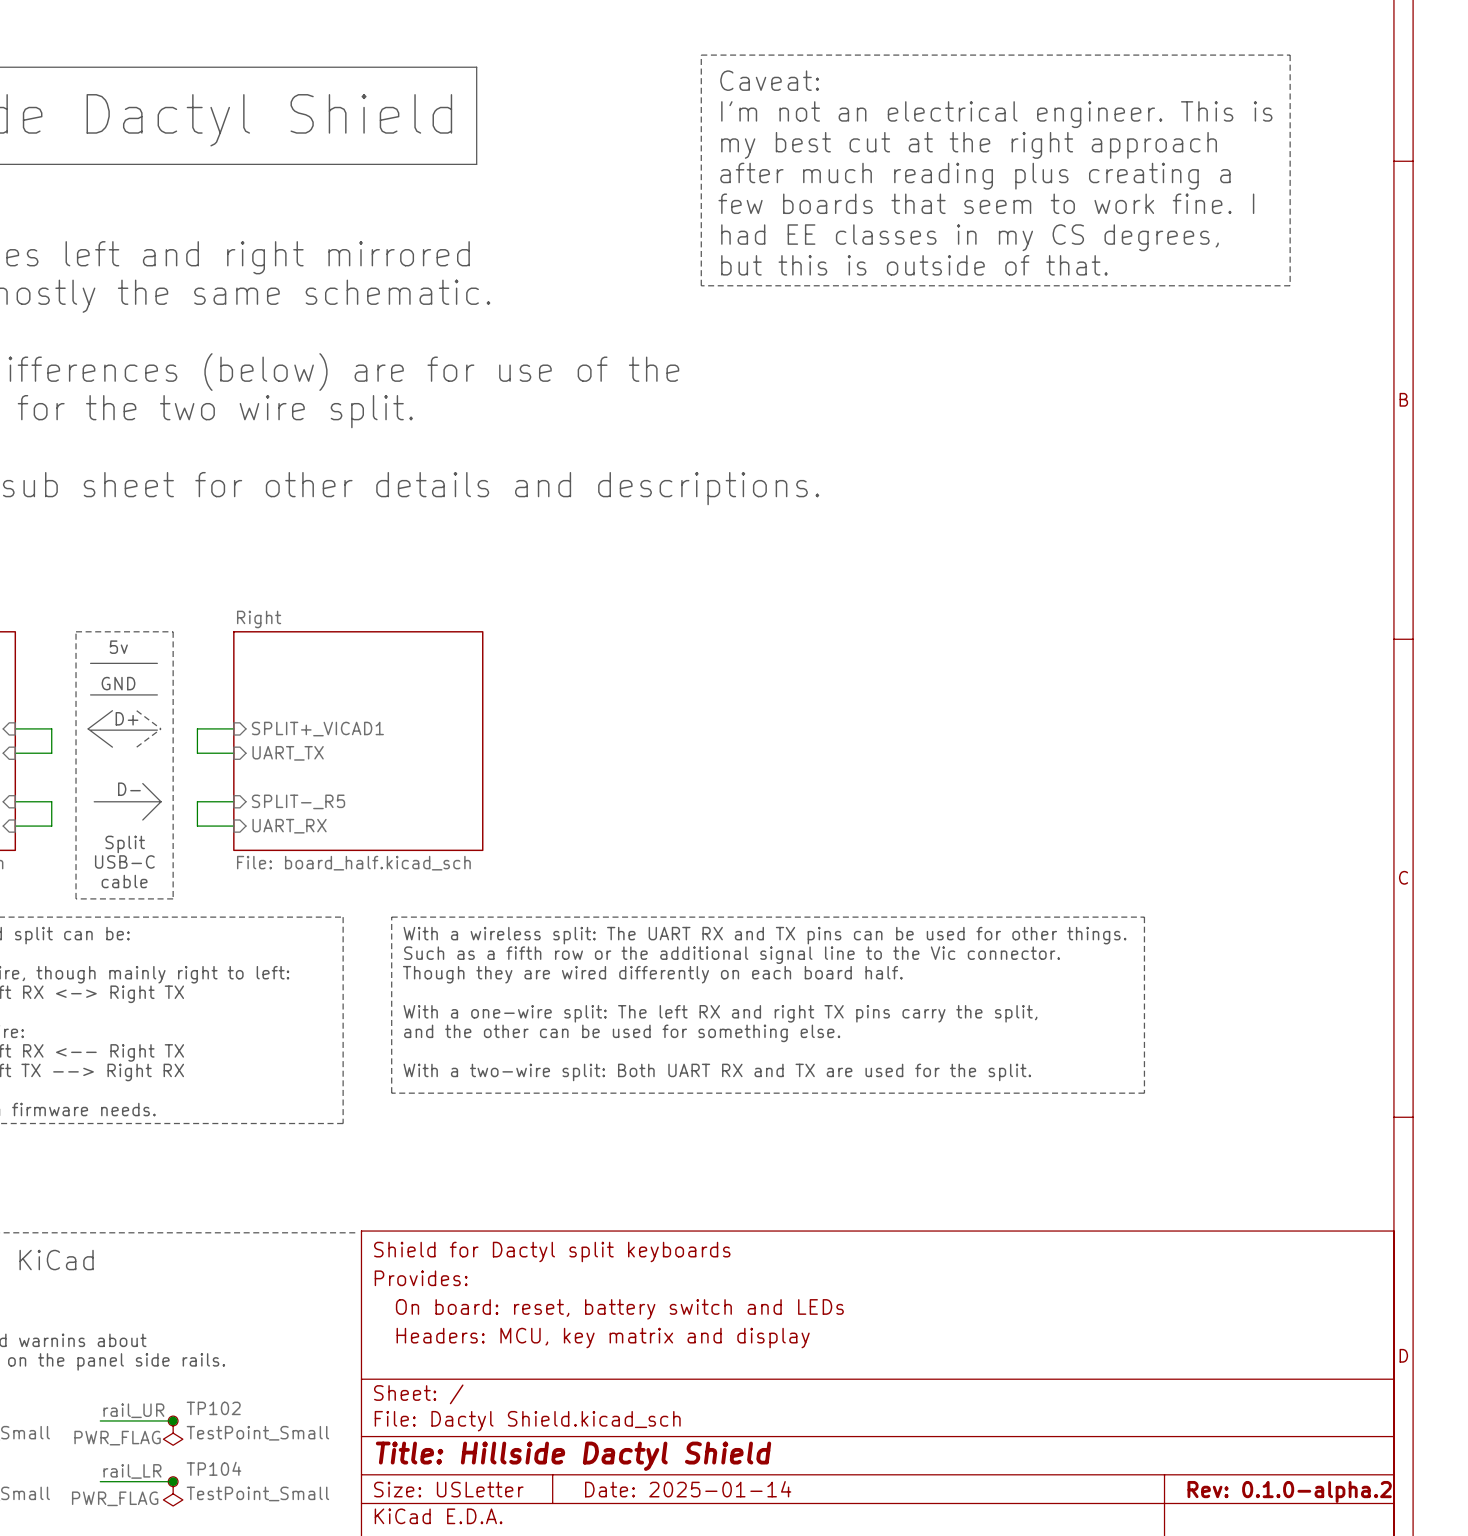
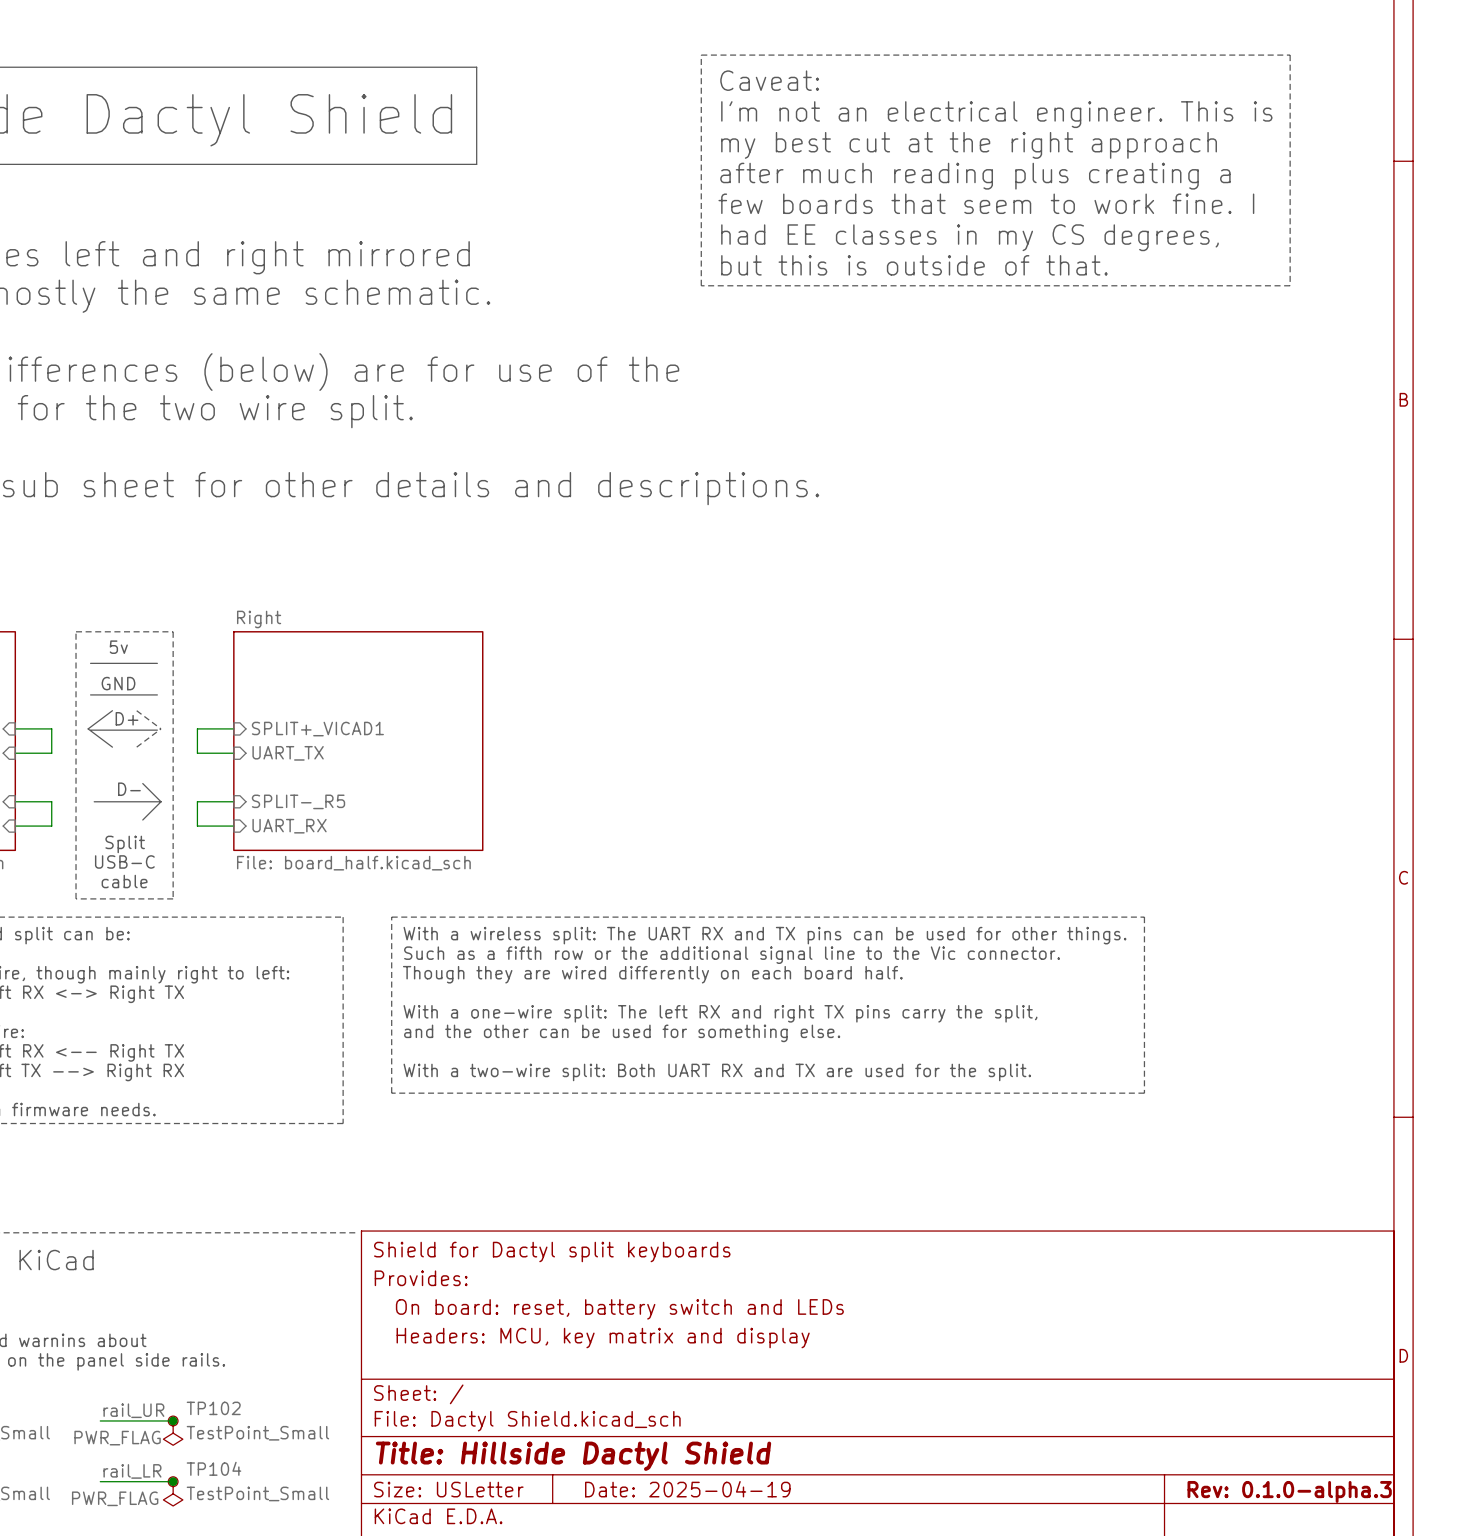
title block: Date: 2025-01-14 (688, 1489) -> Date: 2025-04-19 (687, 1489)
title block: Rev: 0.1.0-alpha.2 (1289, 1491) -> Rev: 0.1.0-alpha.3 (1289, 1491)

